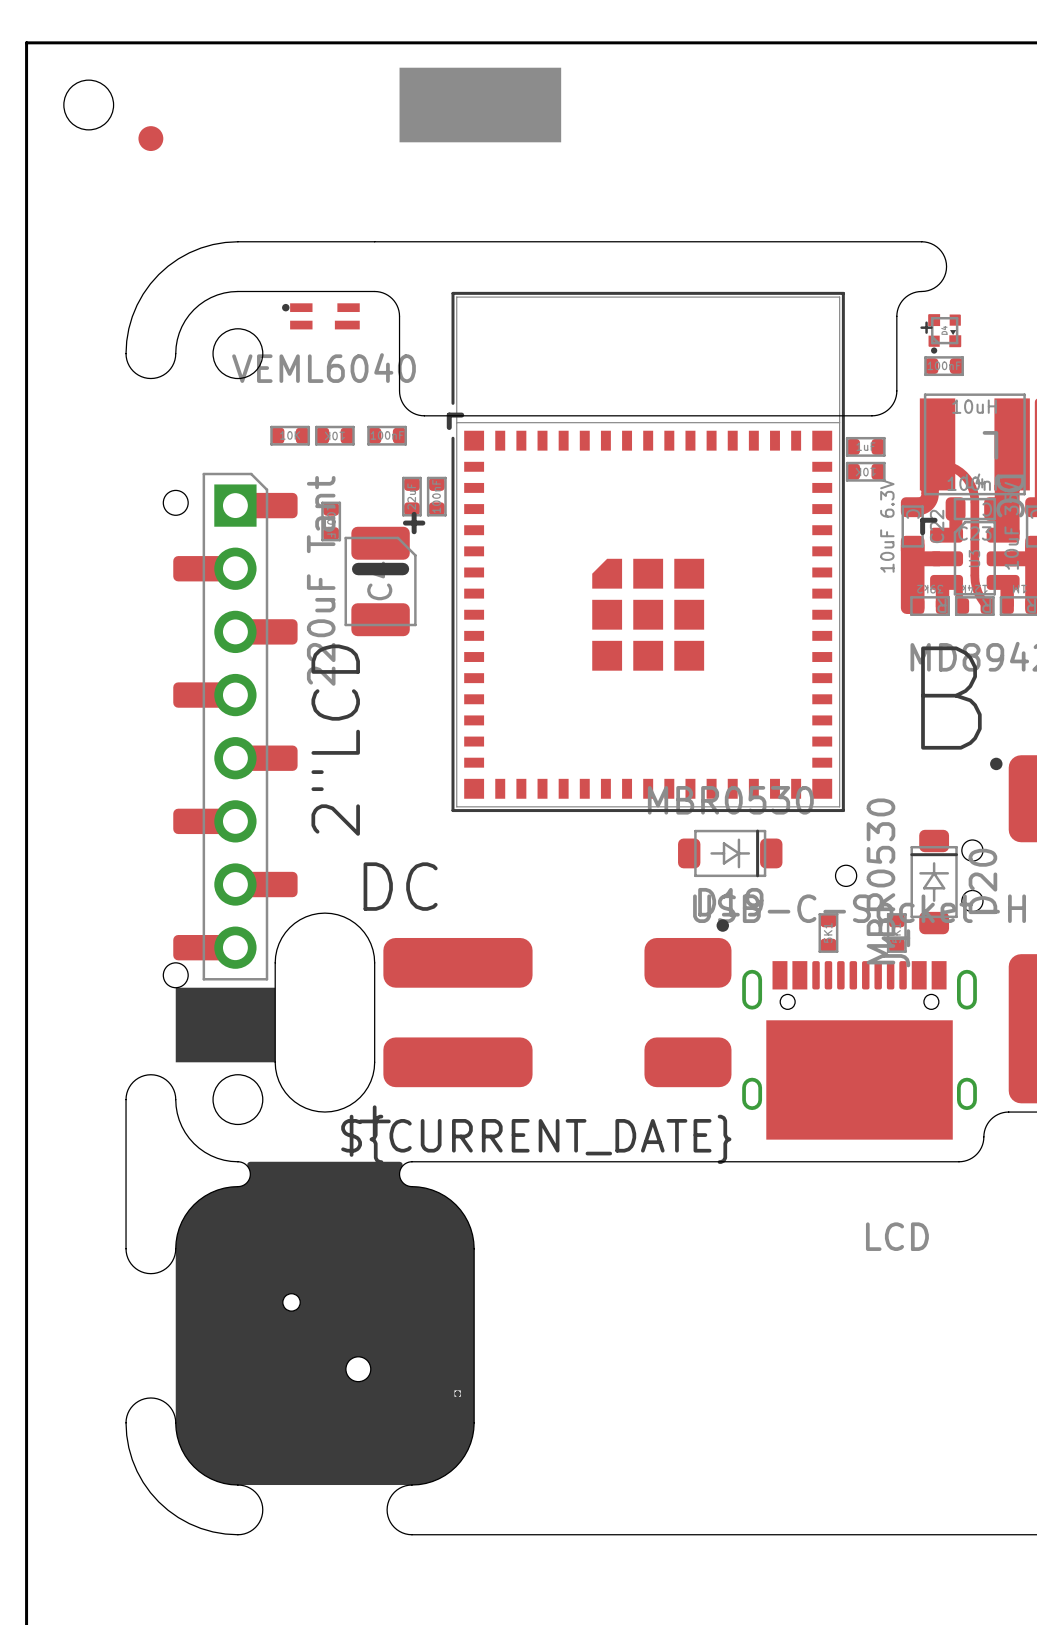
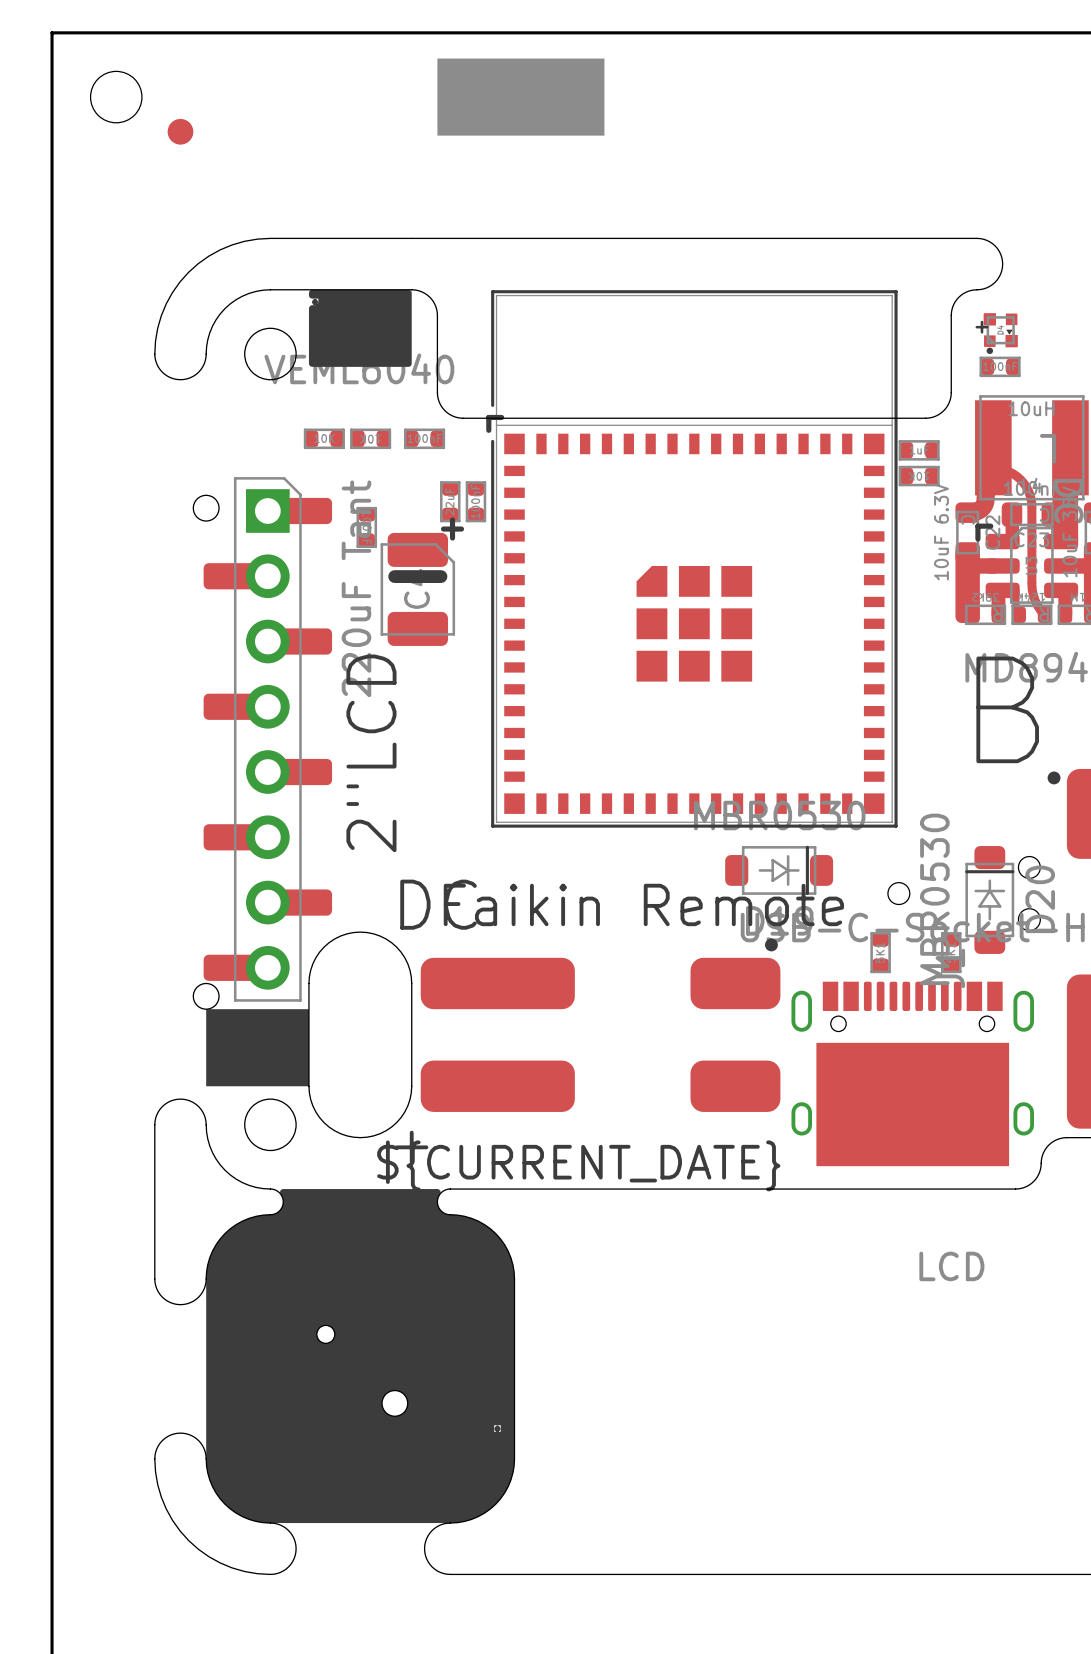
drawing: none -> [308, 289, 412, 367]
text: none -> . (315, 302)
text: none -> Faikin Remote (643, 904)

